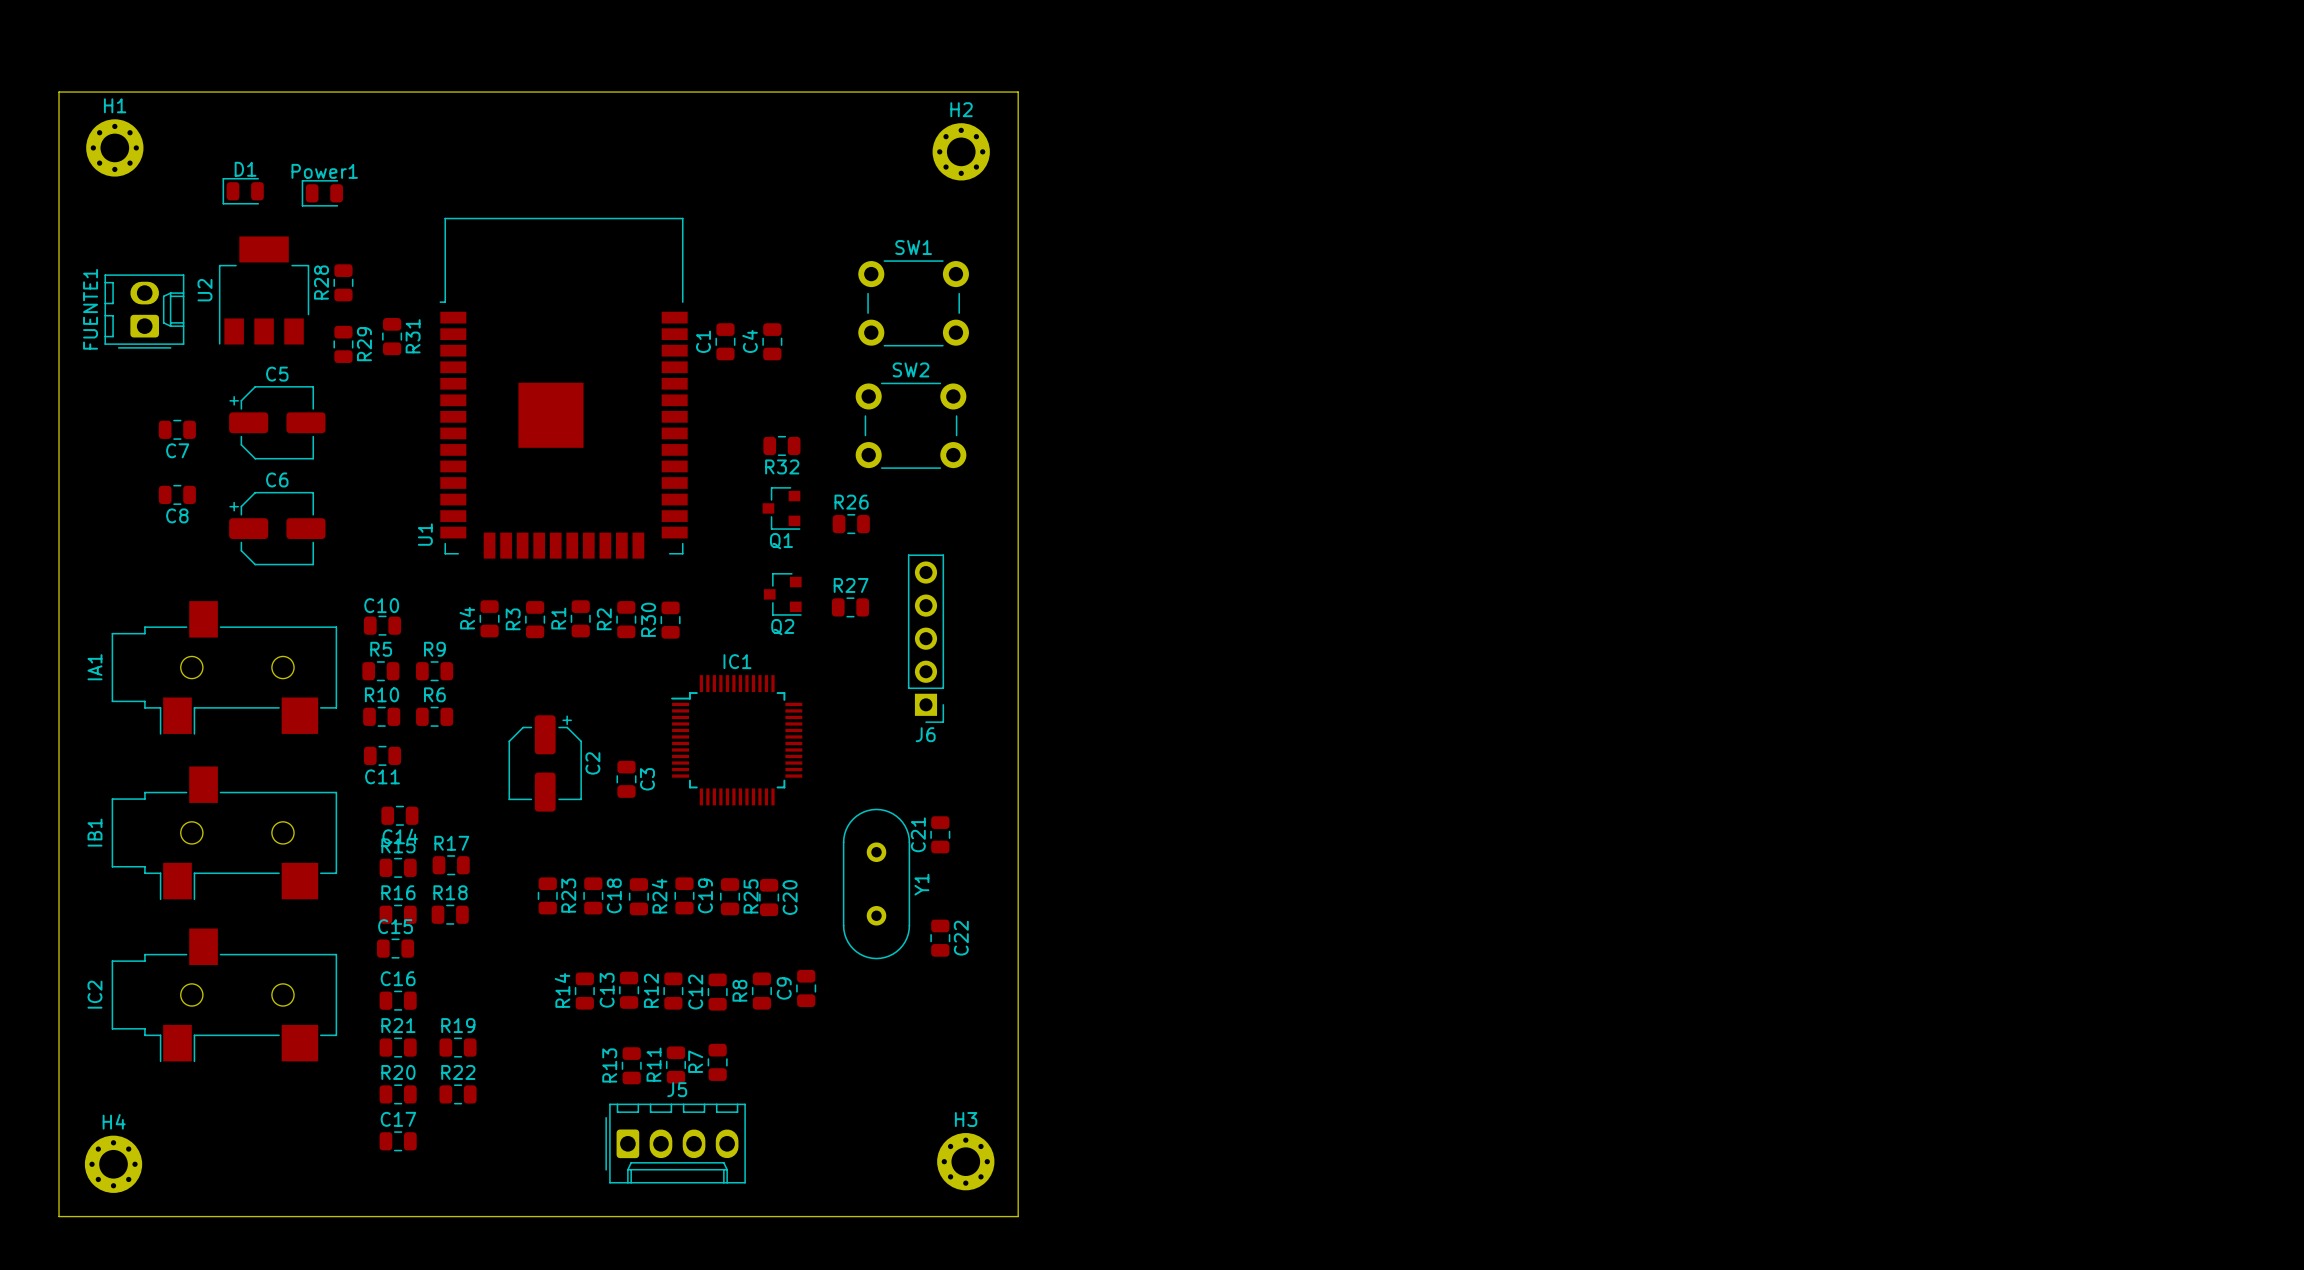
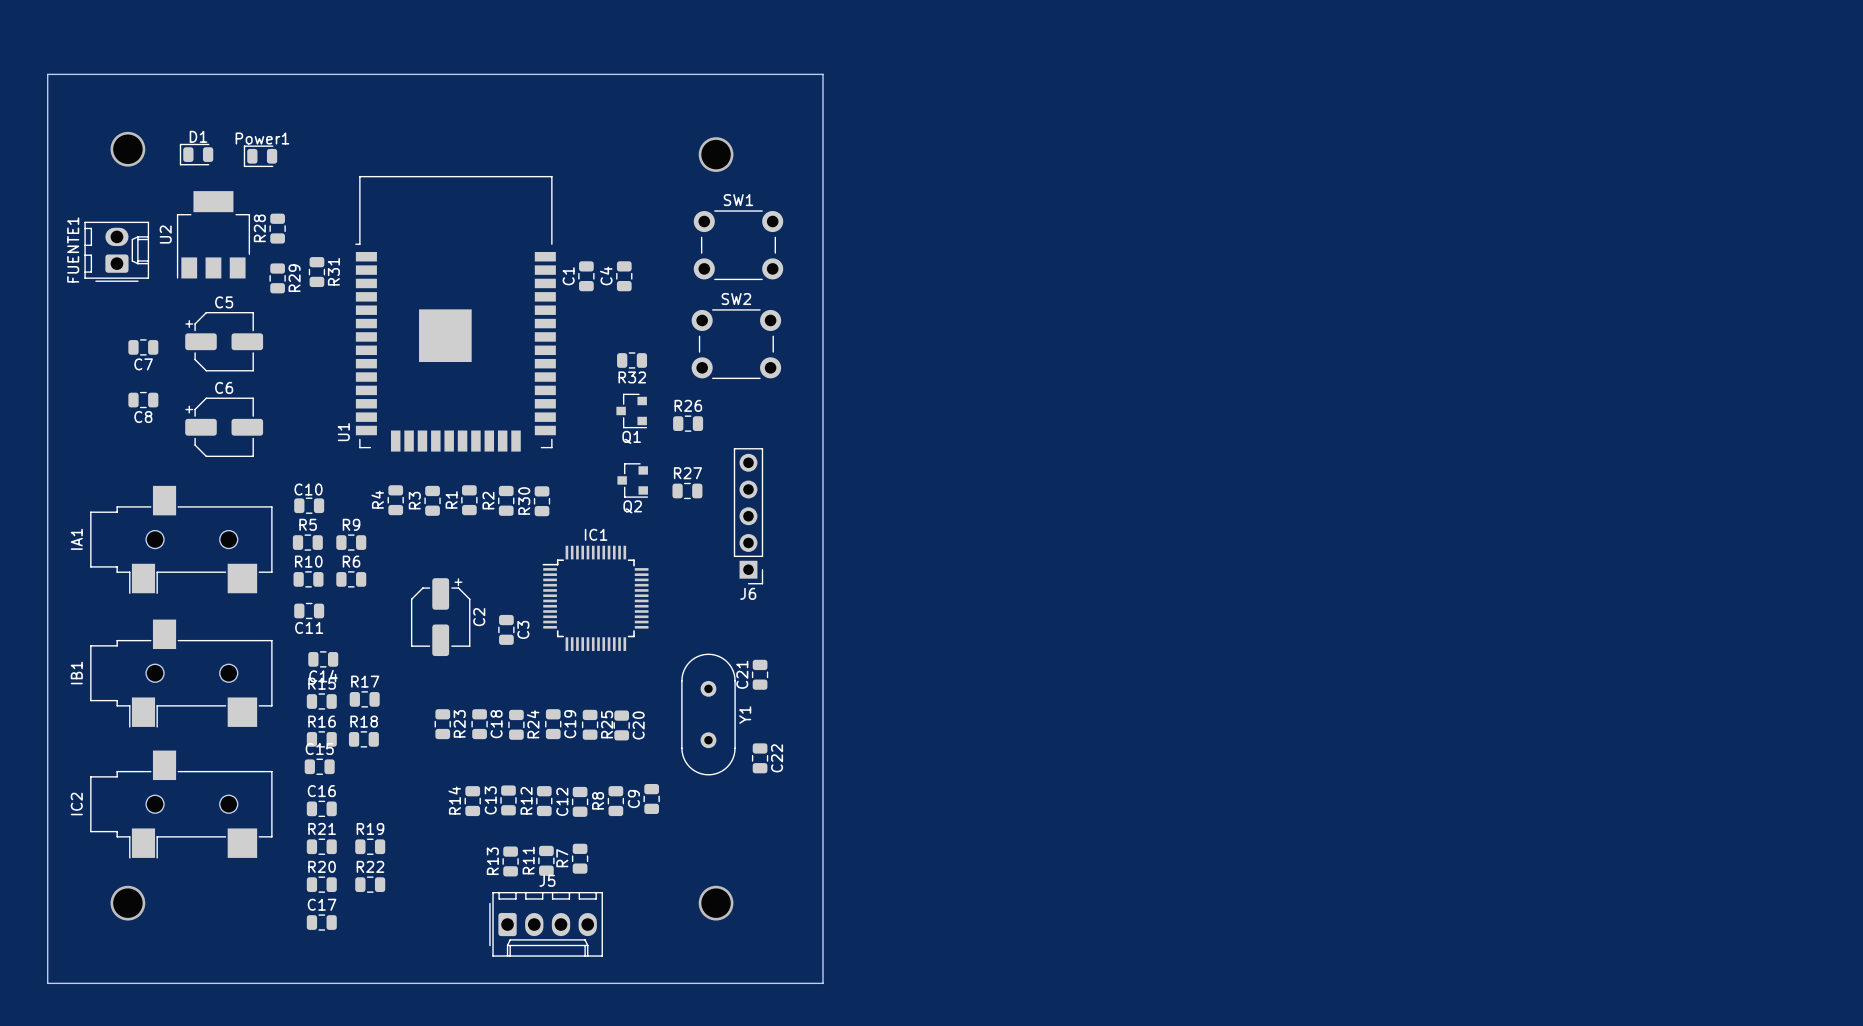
H1: (114, 147) -> none
H2: (961, 151) -> none
via: none -> (127, 149)
via: none -> (716, 154)
via: none -> (127, 903)
via: none -> (716, 903)
H3: (965, 1161) -> none
H4: (113, 1164) -> none

